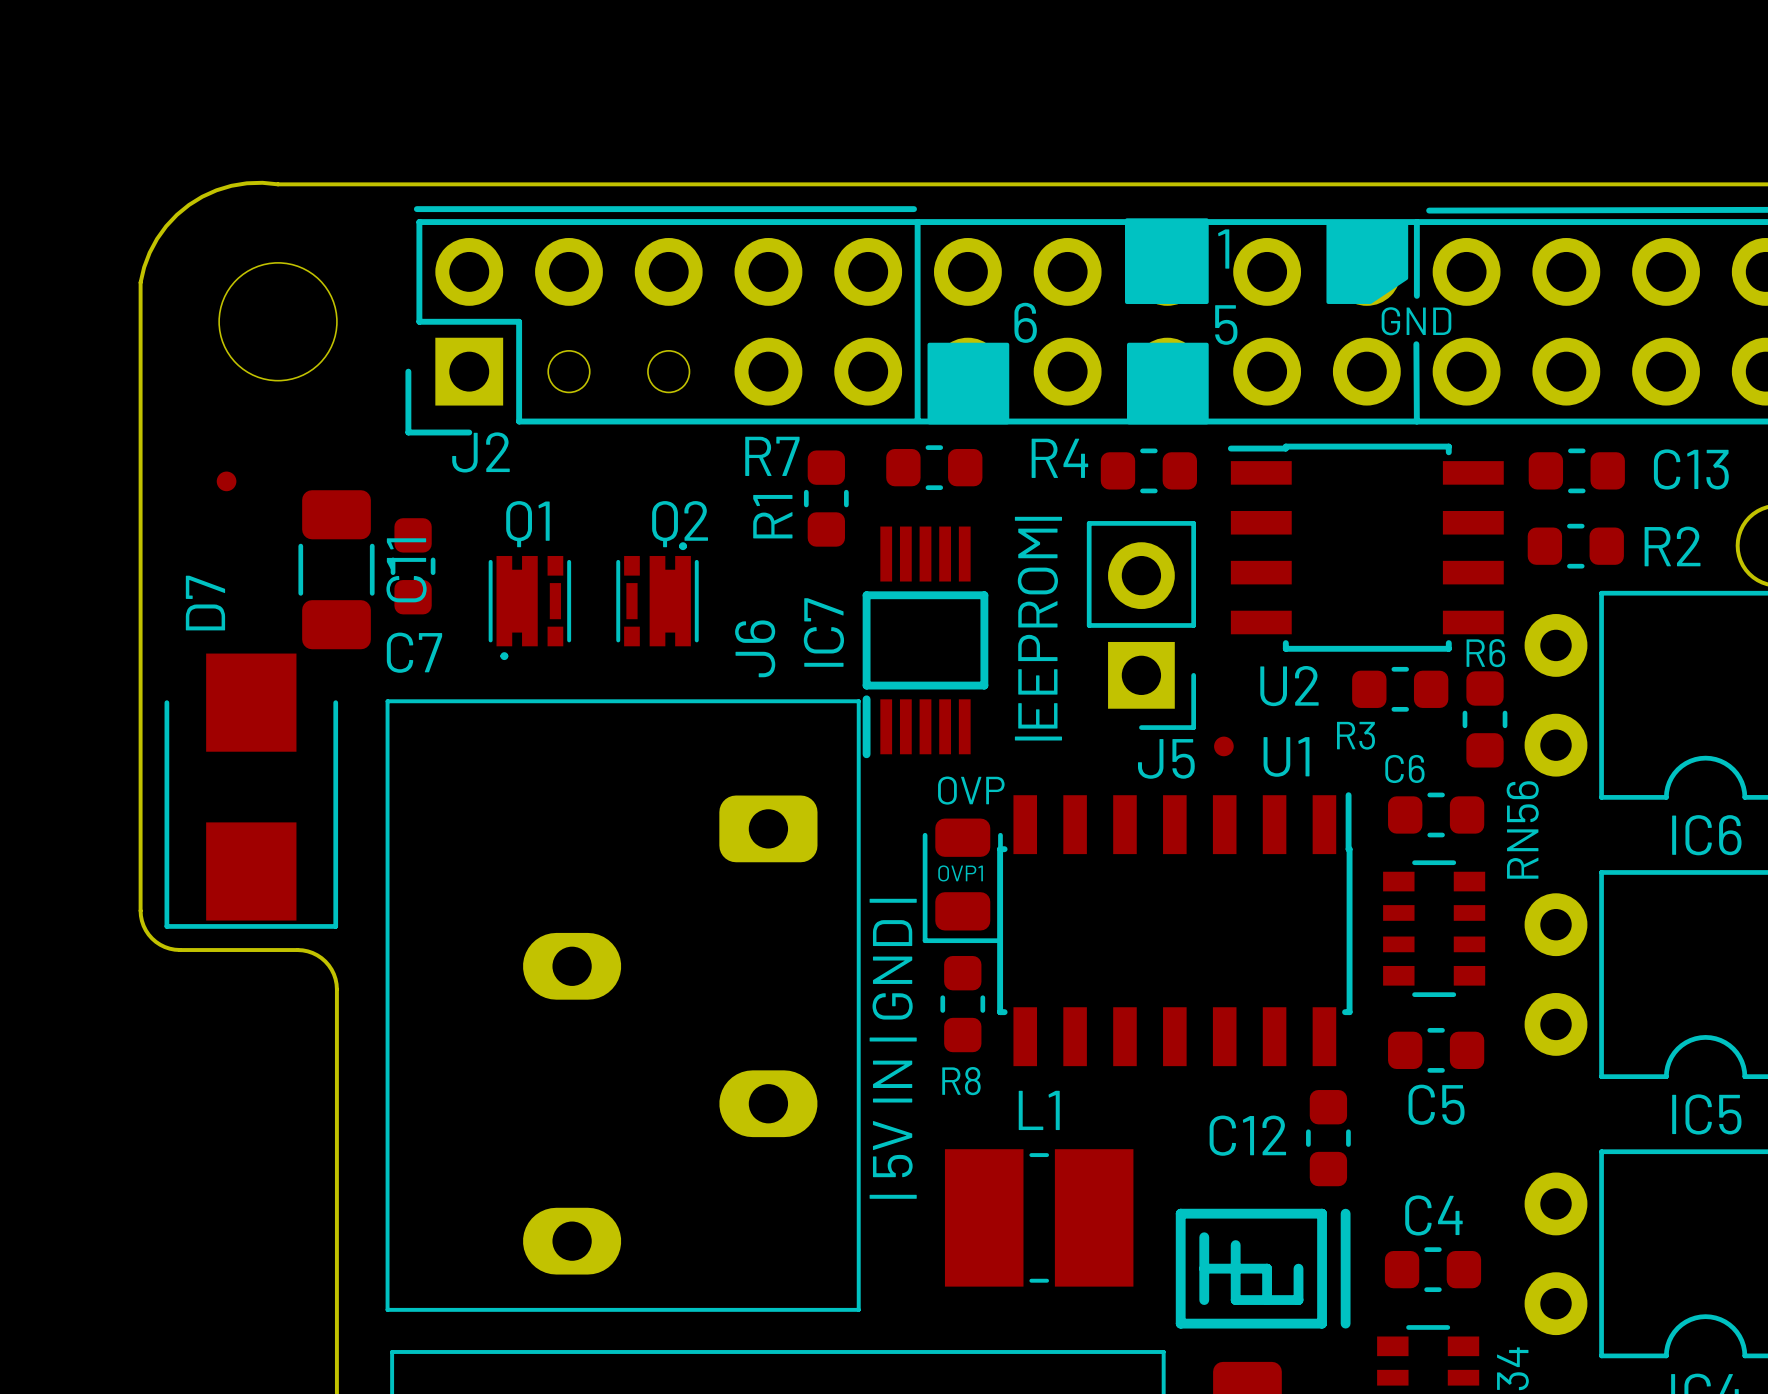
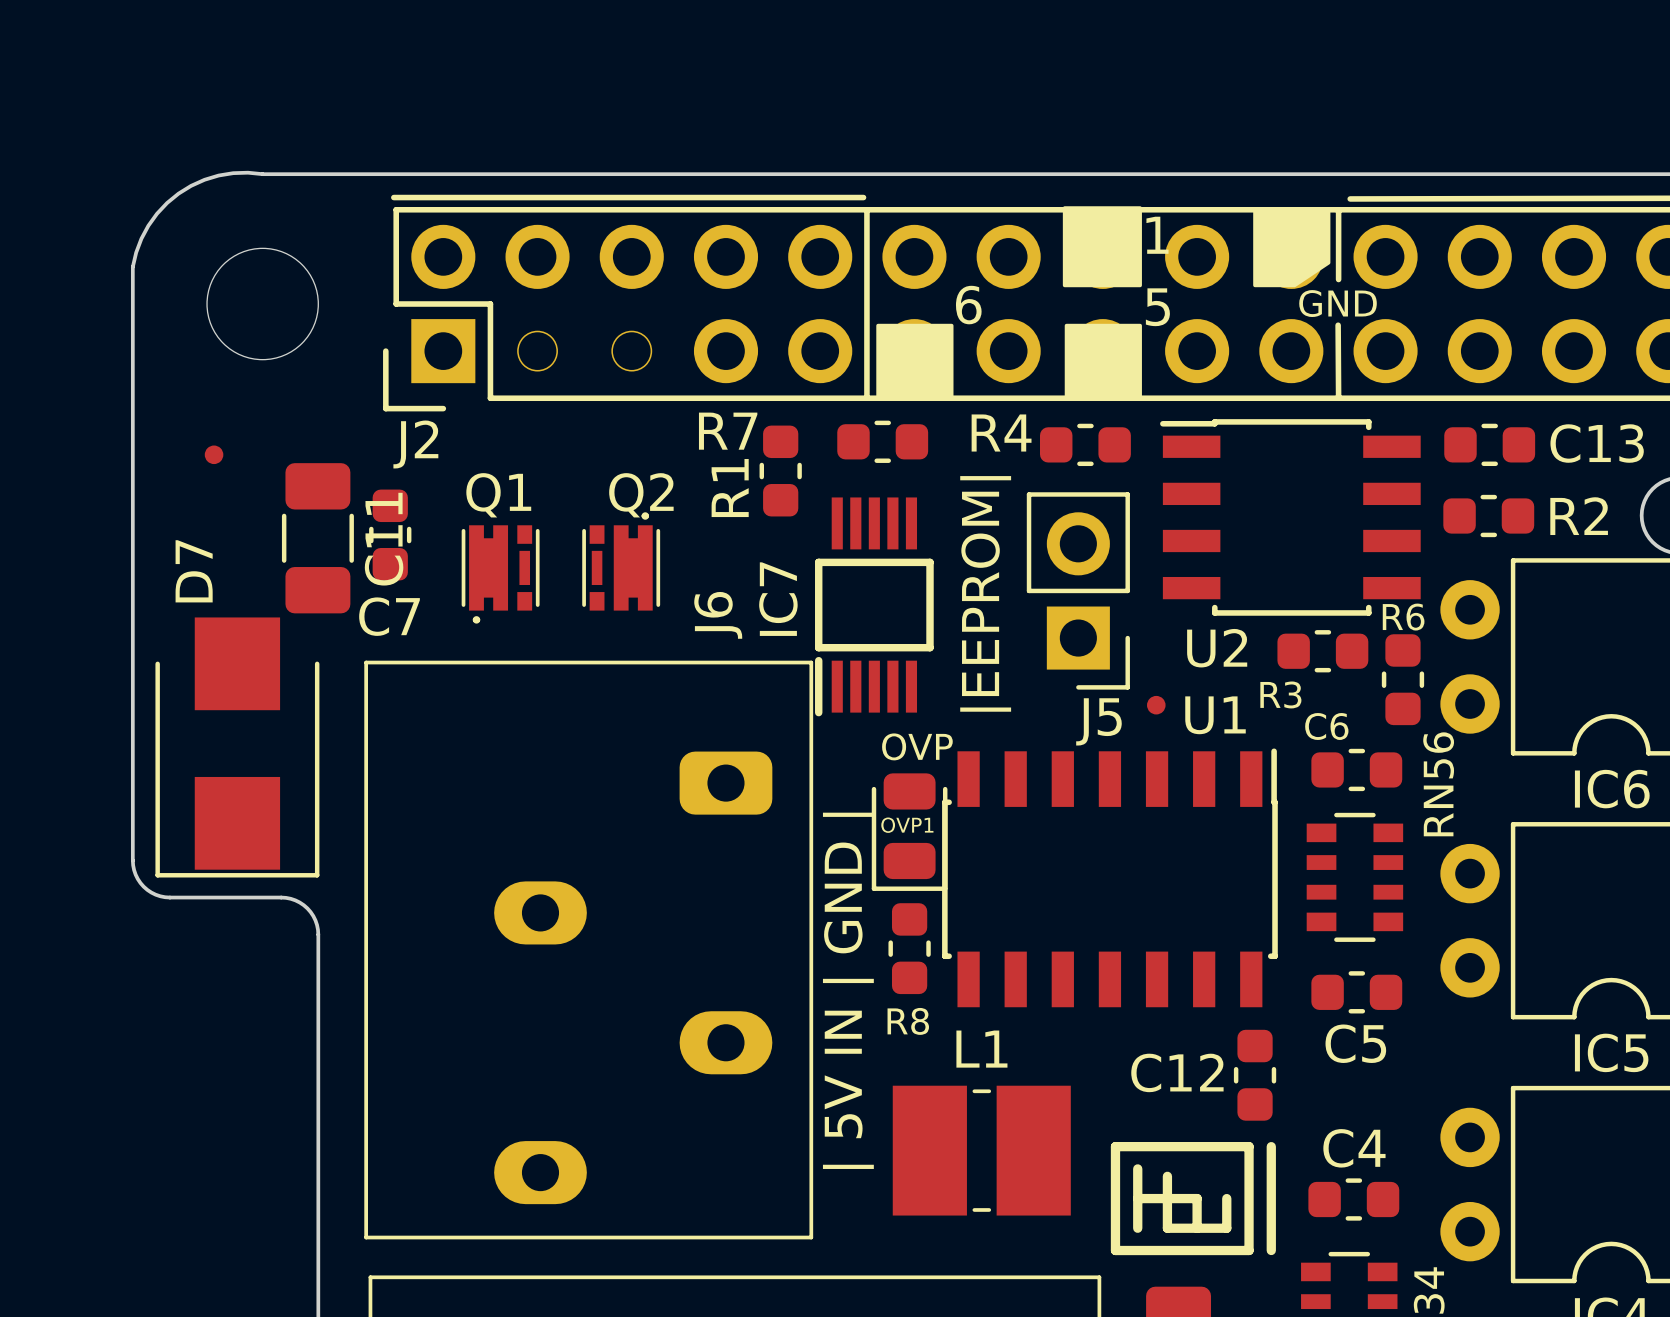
J2 name position: J2 (480, 452) -> J2 (415, 444)

